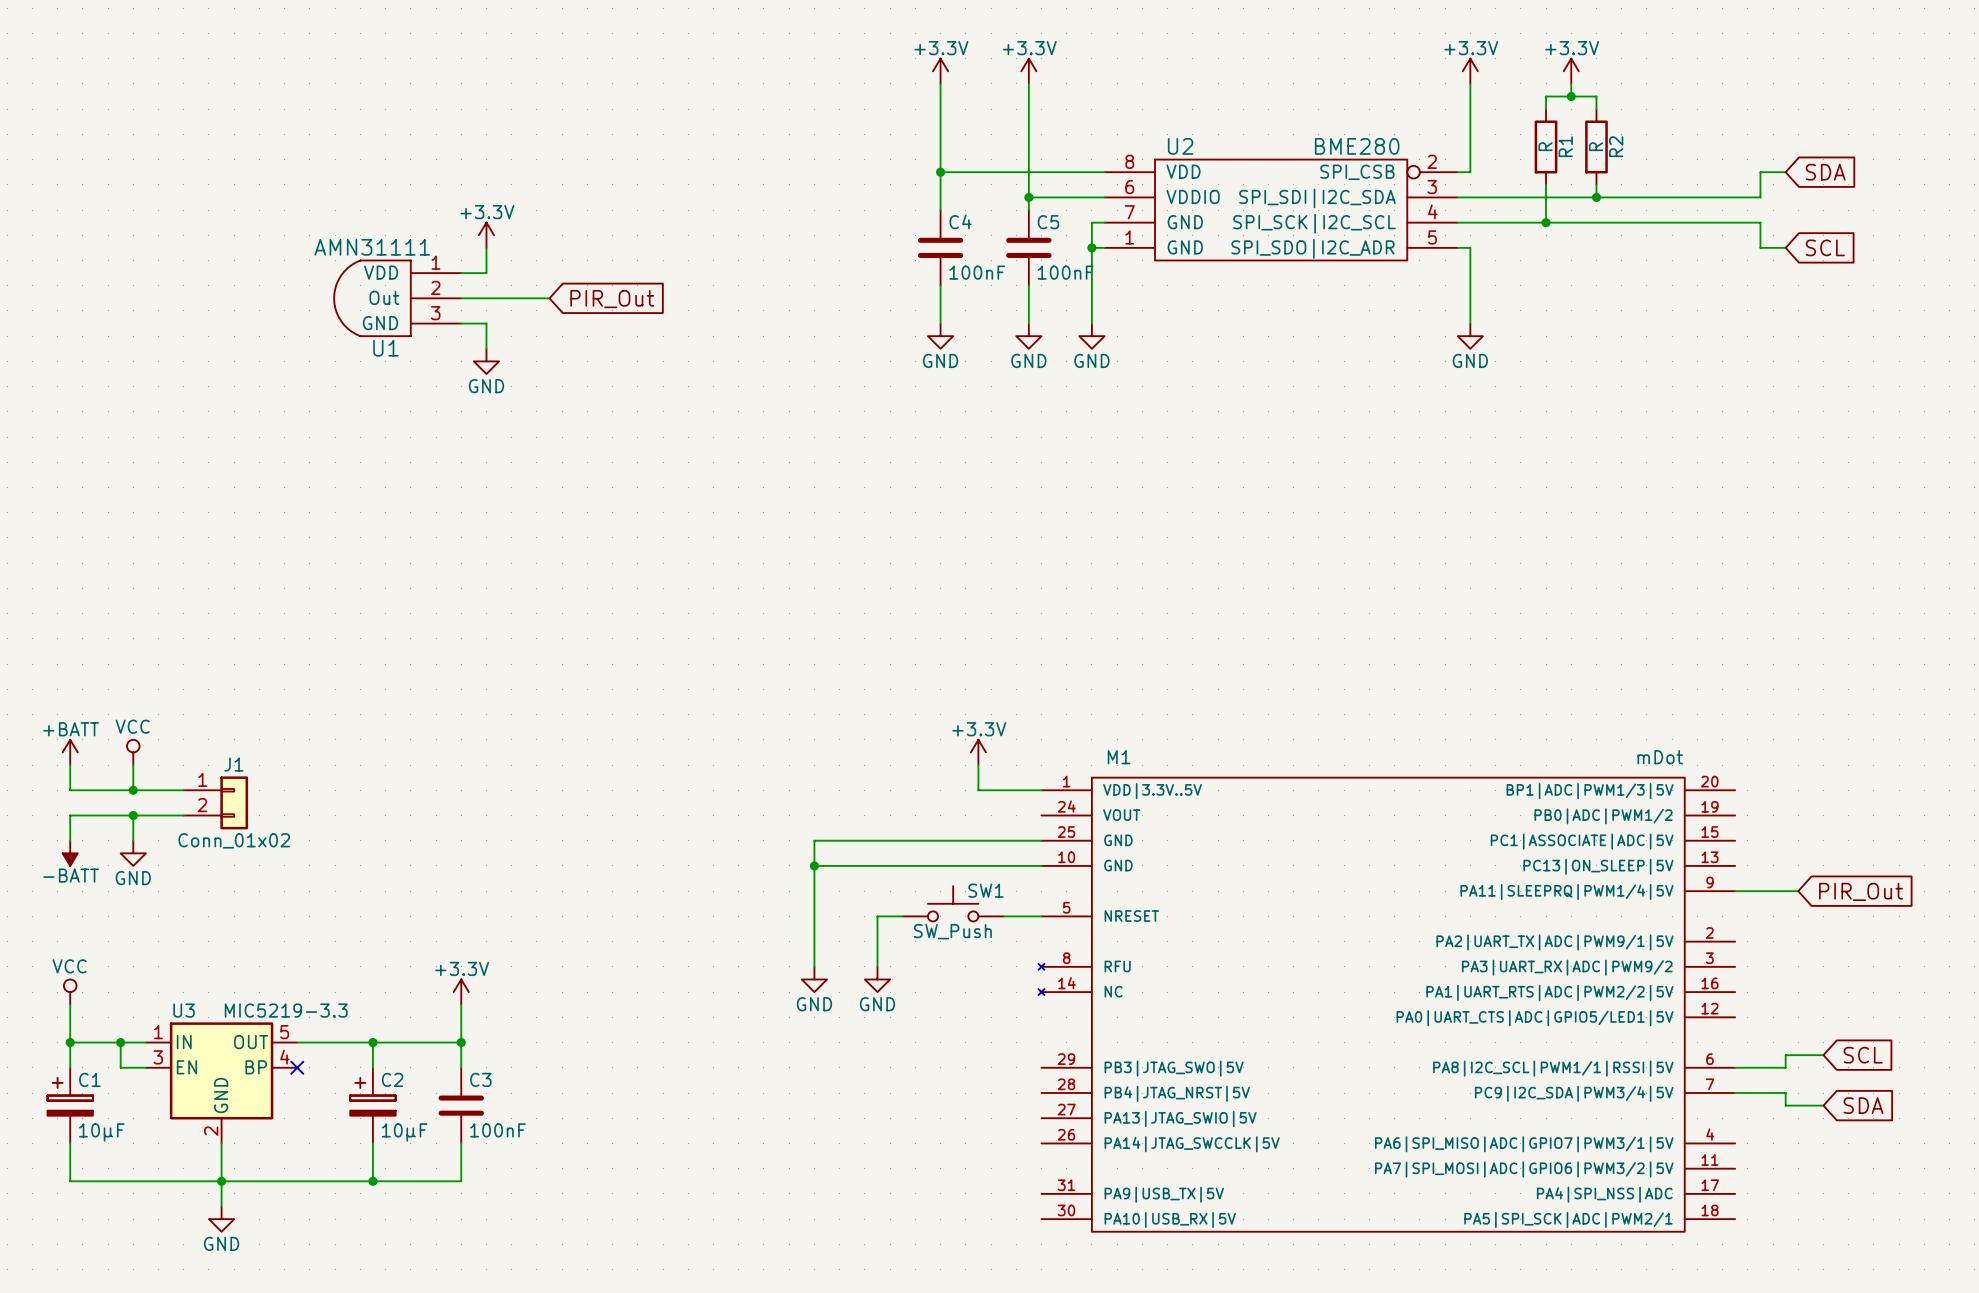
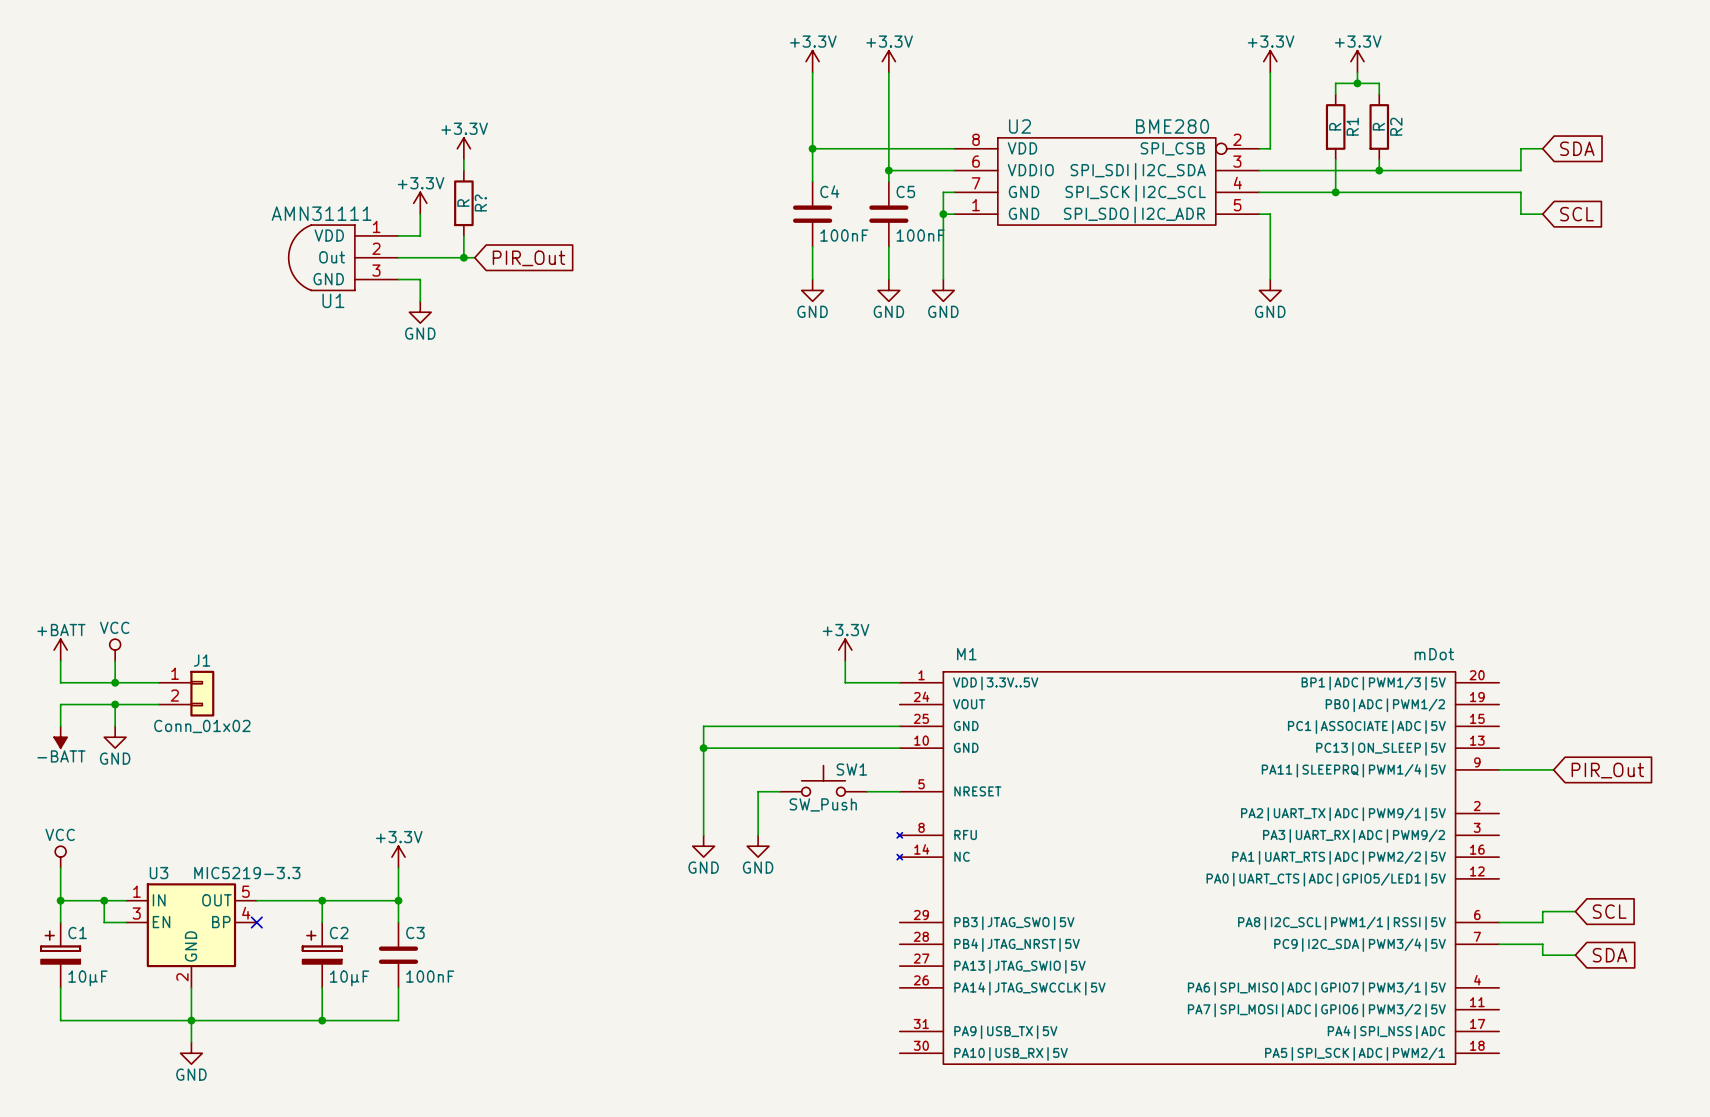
power symbol: none -> +3.3V (463, 148)
wire: none -> (463, 159) (463, 170)
R?: none -> R (463, 203)
wire: none -> (463, 235) (463, 257)
junction: none -> (463, 257)

